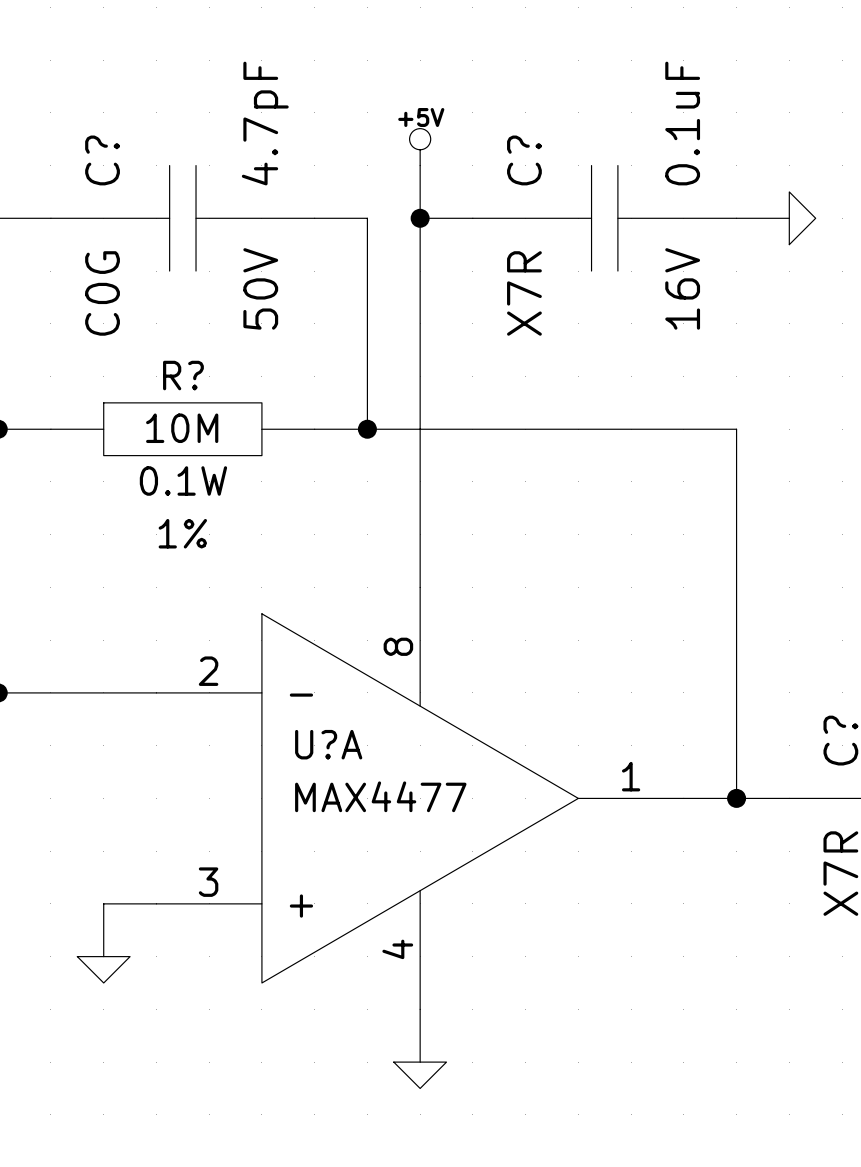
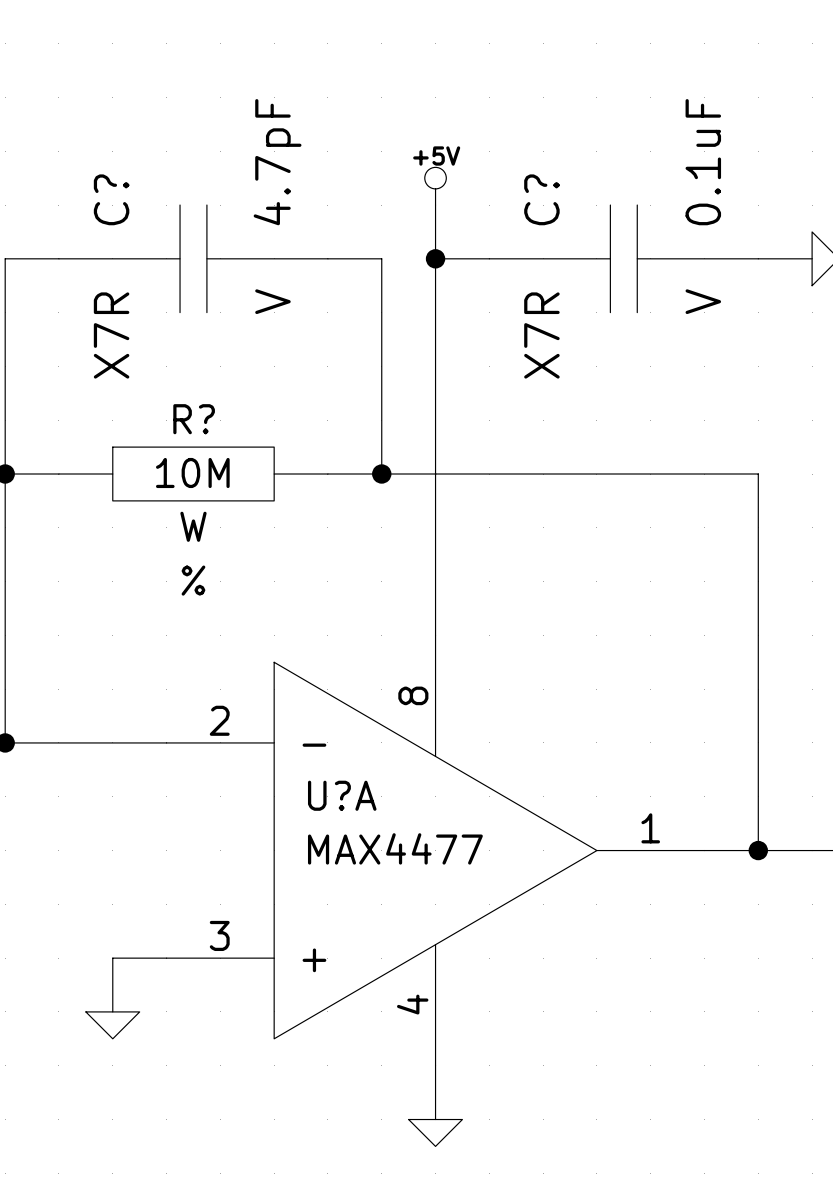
C? text: 50V (260, 288) -> V (272, 301)
C? text: 16V (682, 288) -> V (703, 301)
C? text: C0G (102, 293) -> X7R (111, 335)
R? text: 0.1W (183, 480) -> W (193, 526)
R? text: 1% (182, 533) -> % (193, 580)

